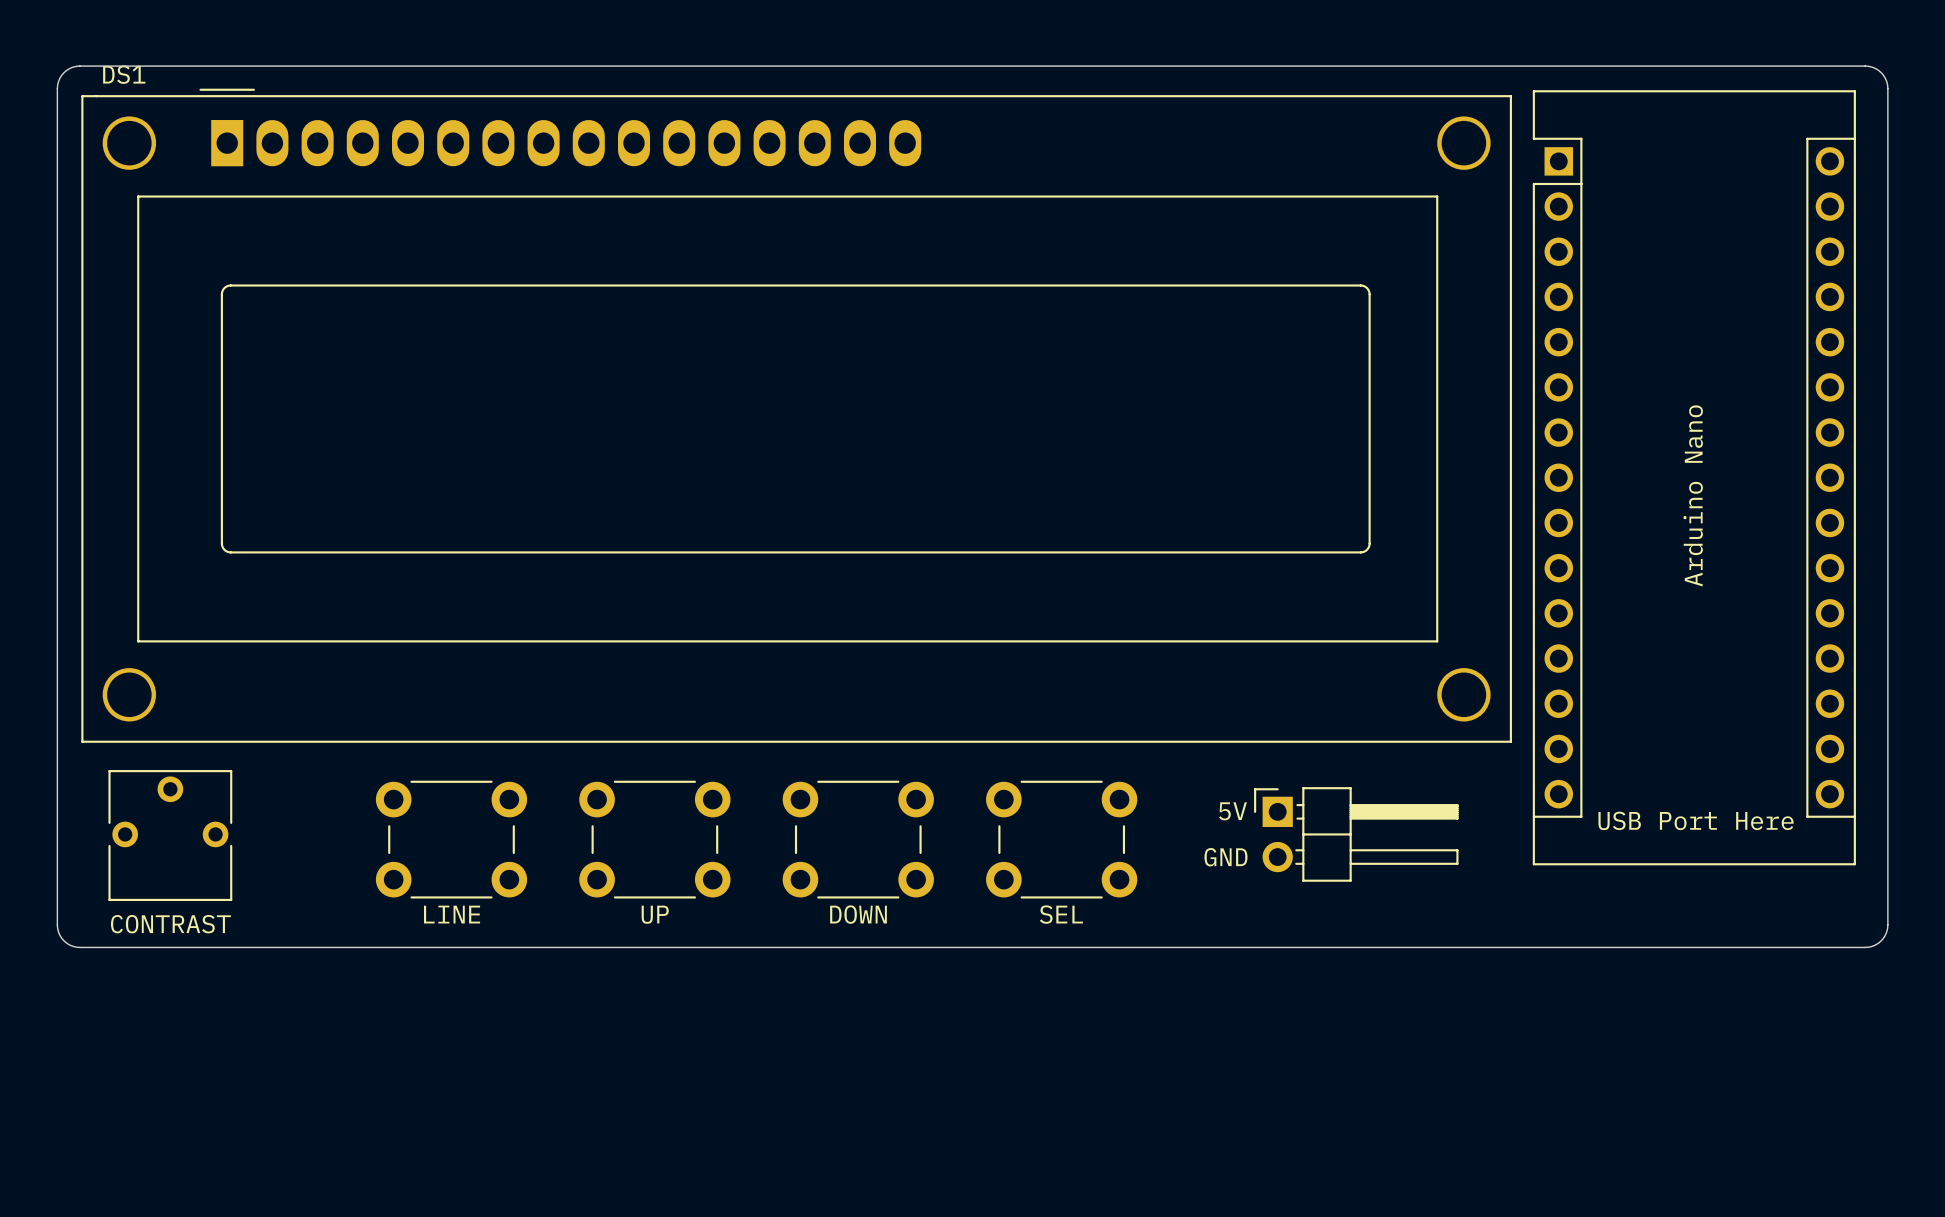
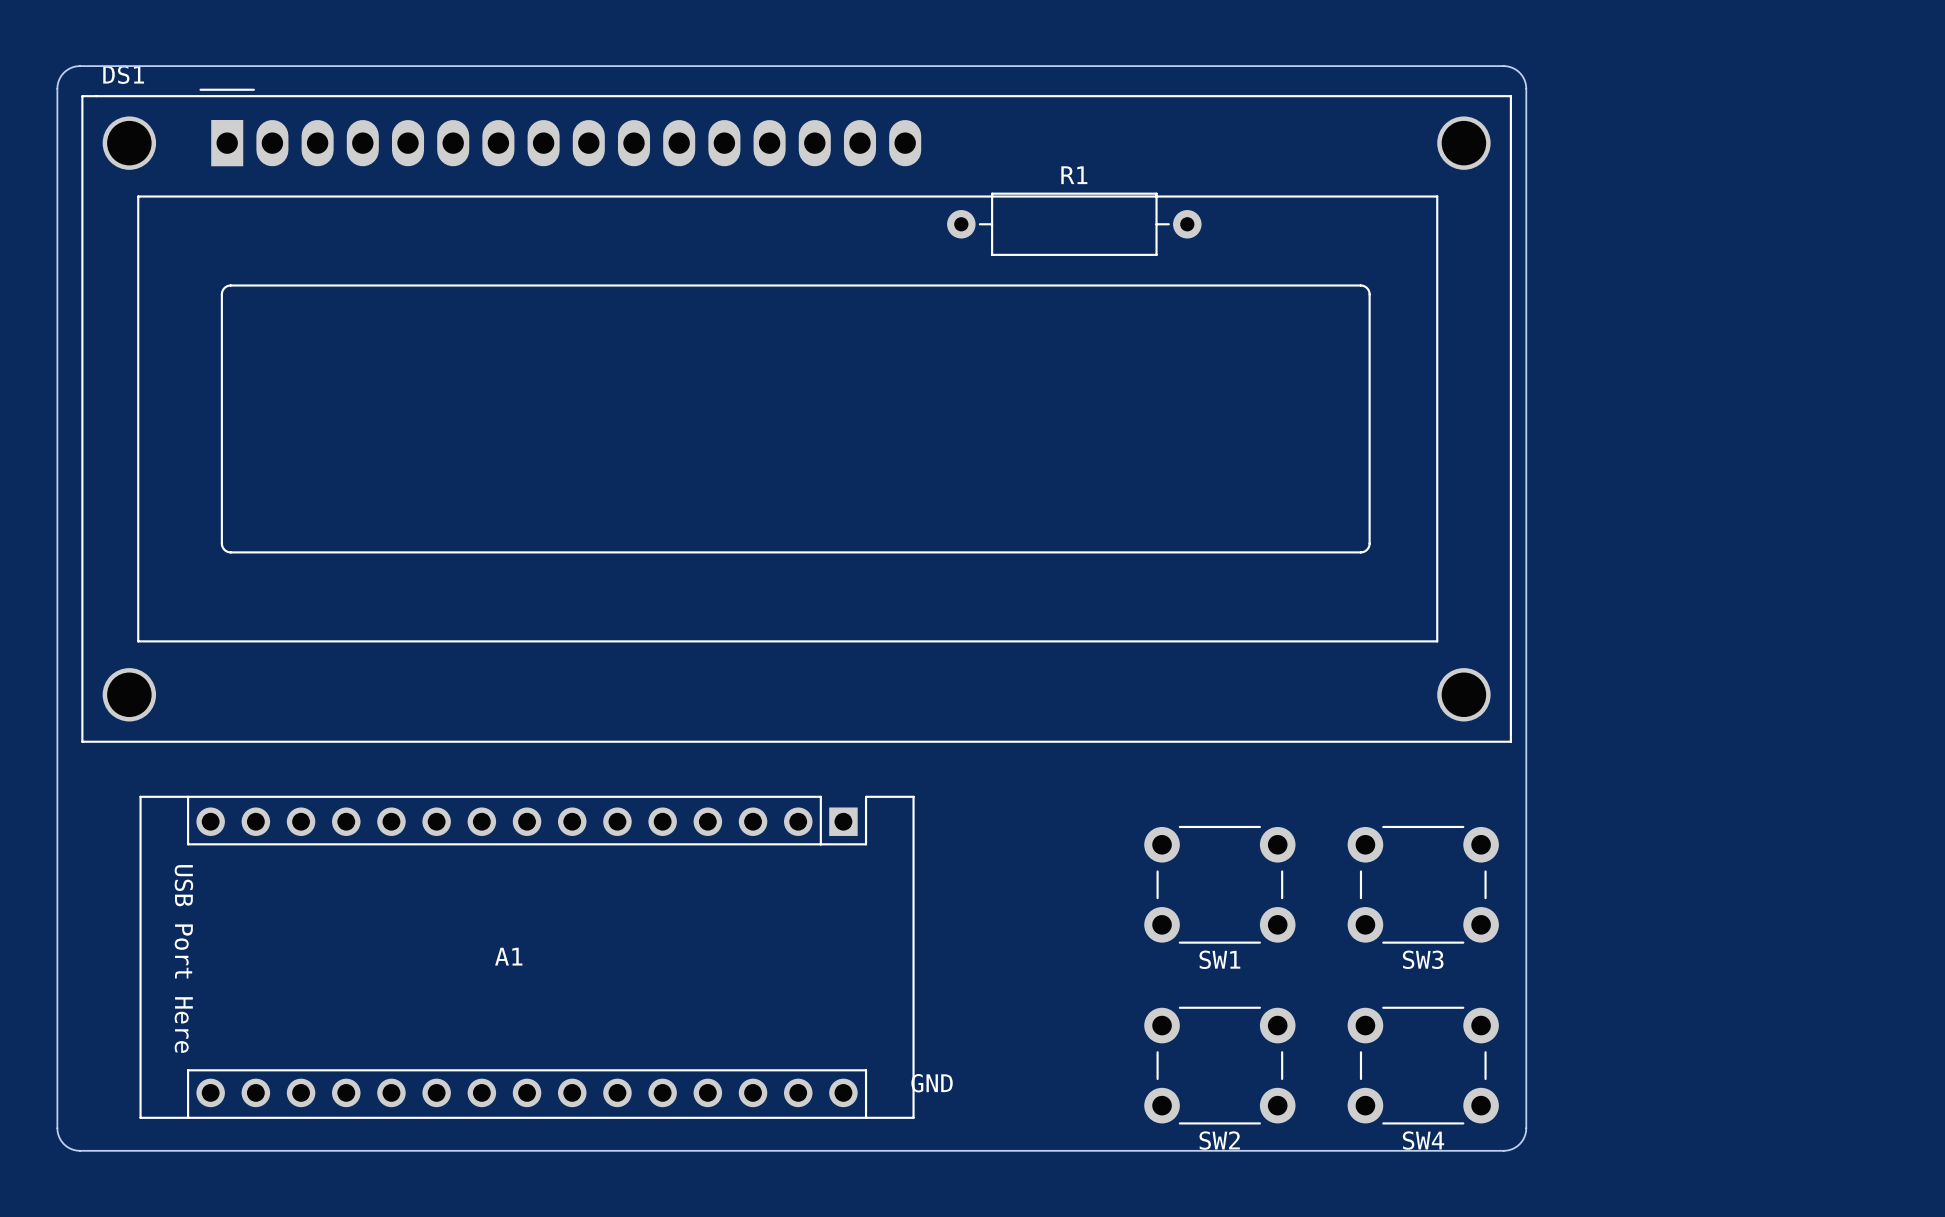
board edge: (1503, 66) (1865, 66) (1876, 69) (1886, 80) (1887, 88) (1887, 924) (1884, 936) (1876, 944) (1865, 947) (79, 947) (71, 945) (63, 940) (59, 933) (57, 924) -> (1503, 66) (1512, 67) (1519, 72) (1524, 80) (1526, 88) (1526, 1128) (1523, 1139) (1514, 1147) (1503, 1150) (77, 1150) (63, 1144) (57, 1131) (57, 924)
R1: none -> (1074, 224)
Arduino Nano: (1694, 477) -> none
text: USB Port Here (1696, 820) -> none
5V: (1356, 834) -> none
CONTRAST: (170, 835) -> none
LINE: (451, 839) -> none
UP: (654, 839) -> none
DOWN: (858, 839) -> none
SEL: (1061, 839) -> none
text position: GND (1225, 857) -> GND (932, 1083)
SW1: none -> (1219, 884)
SW3: none -> (1423, 884)
A1: none -> (527, 957)
text: none -> USB Port Here (183, 958)
SW2: none -> (1219, 1065)
SW4: none -> (1423, 1065)

